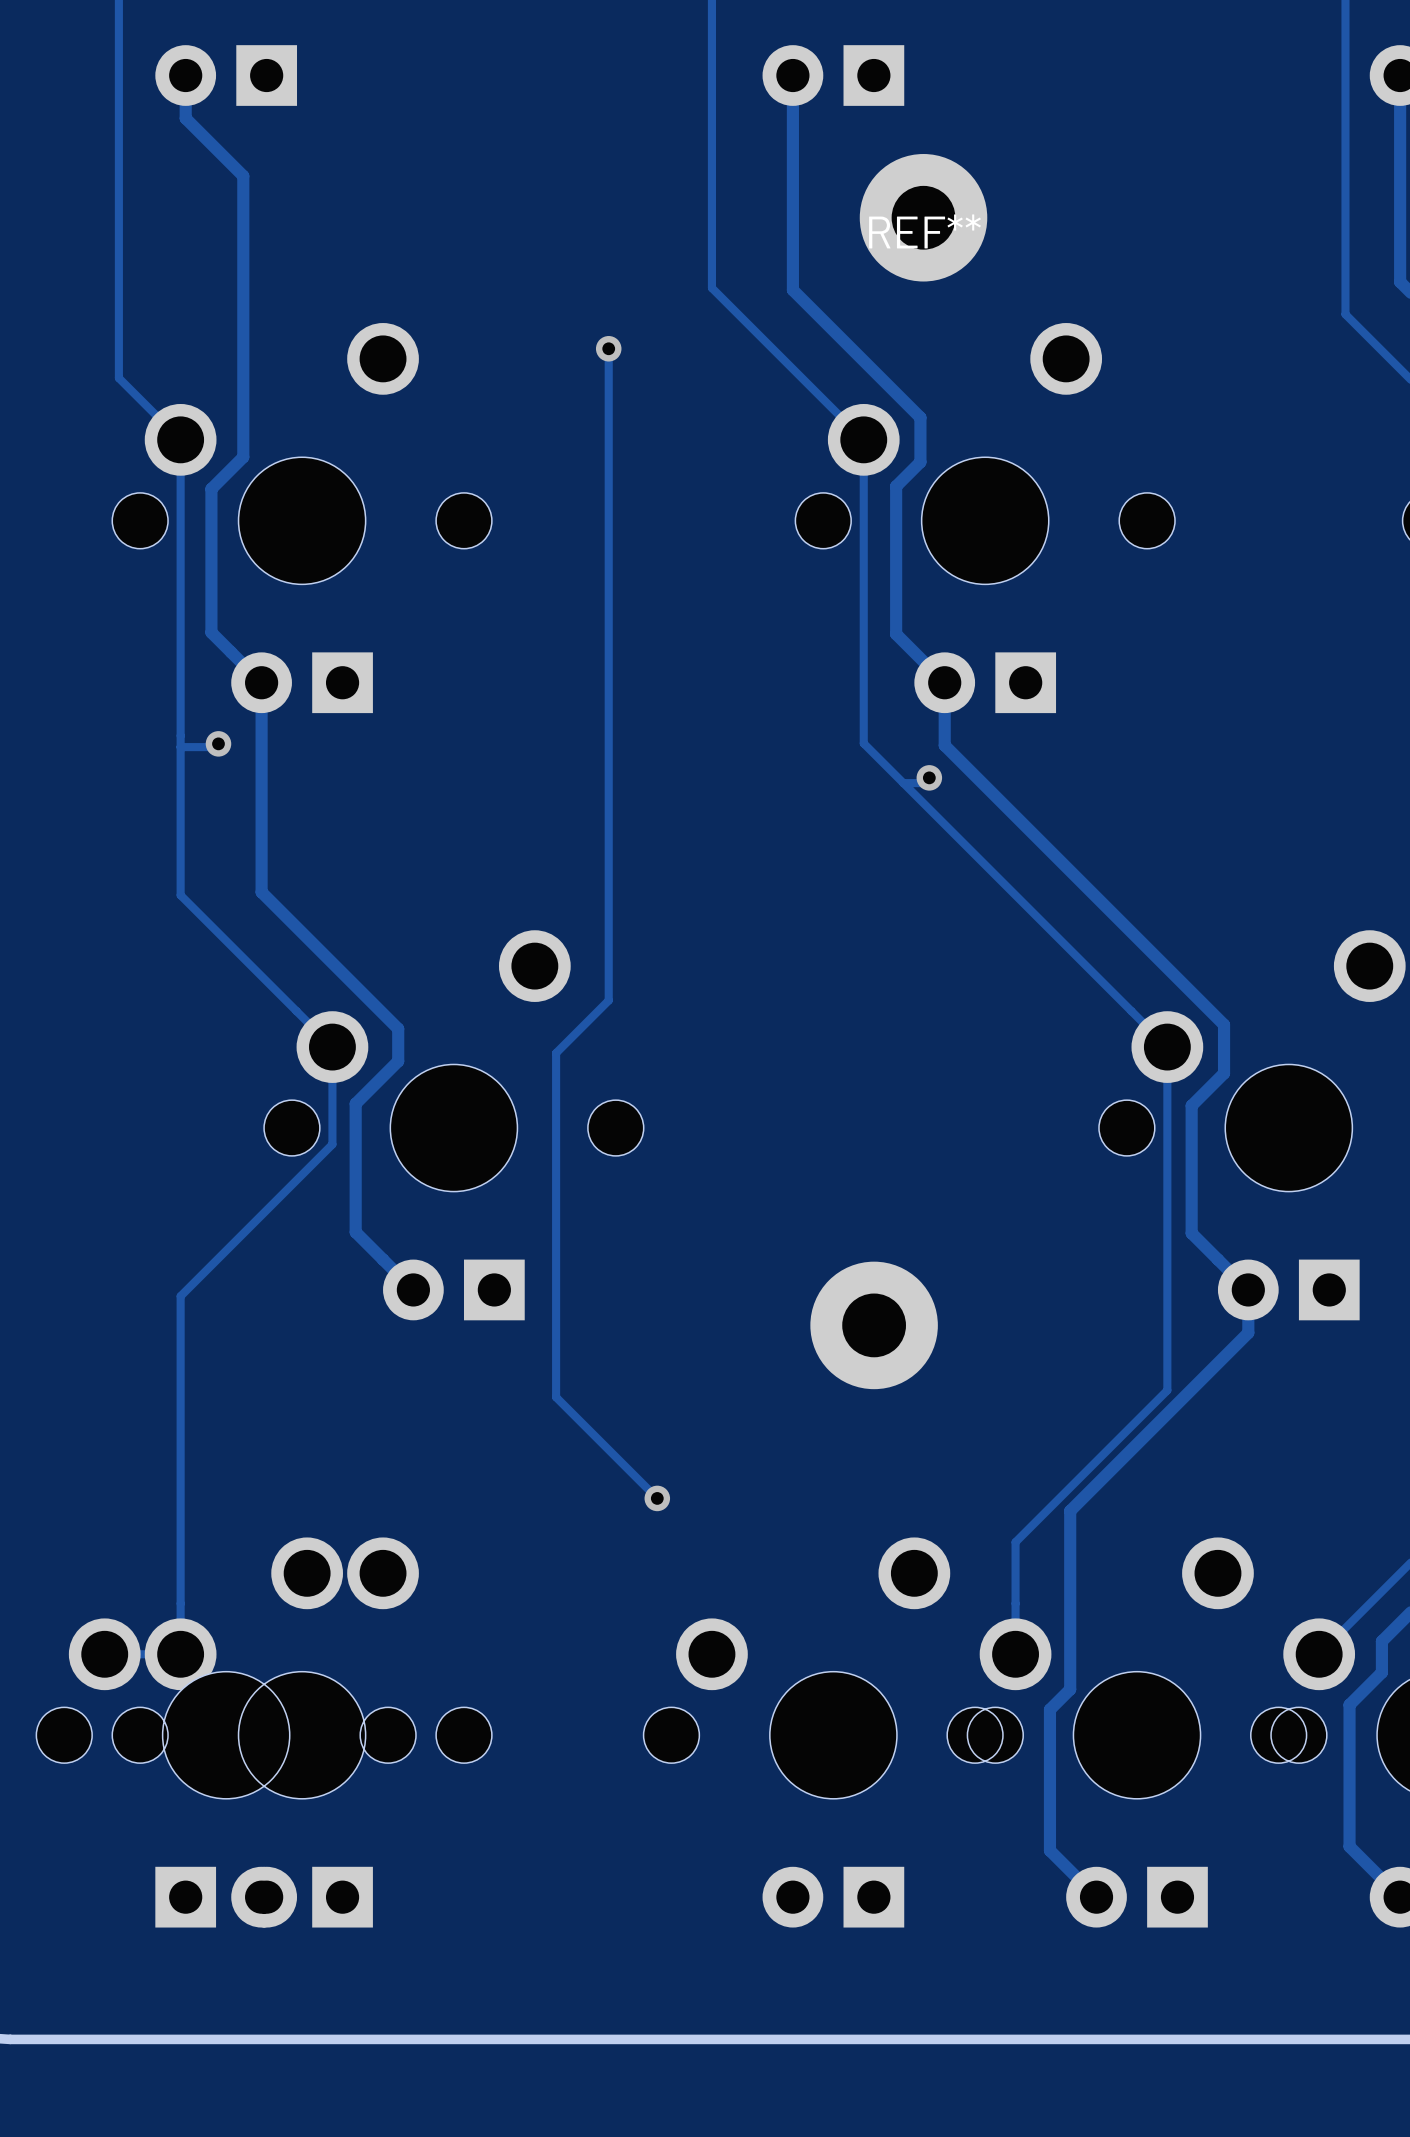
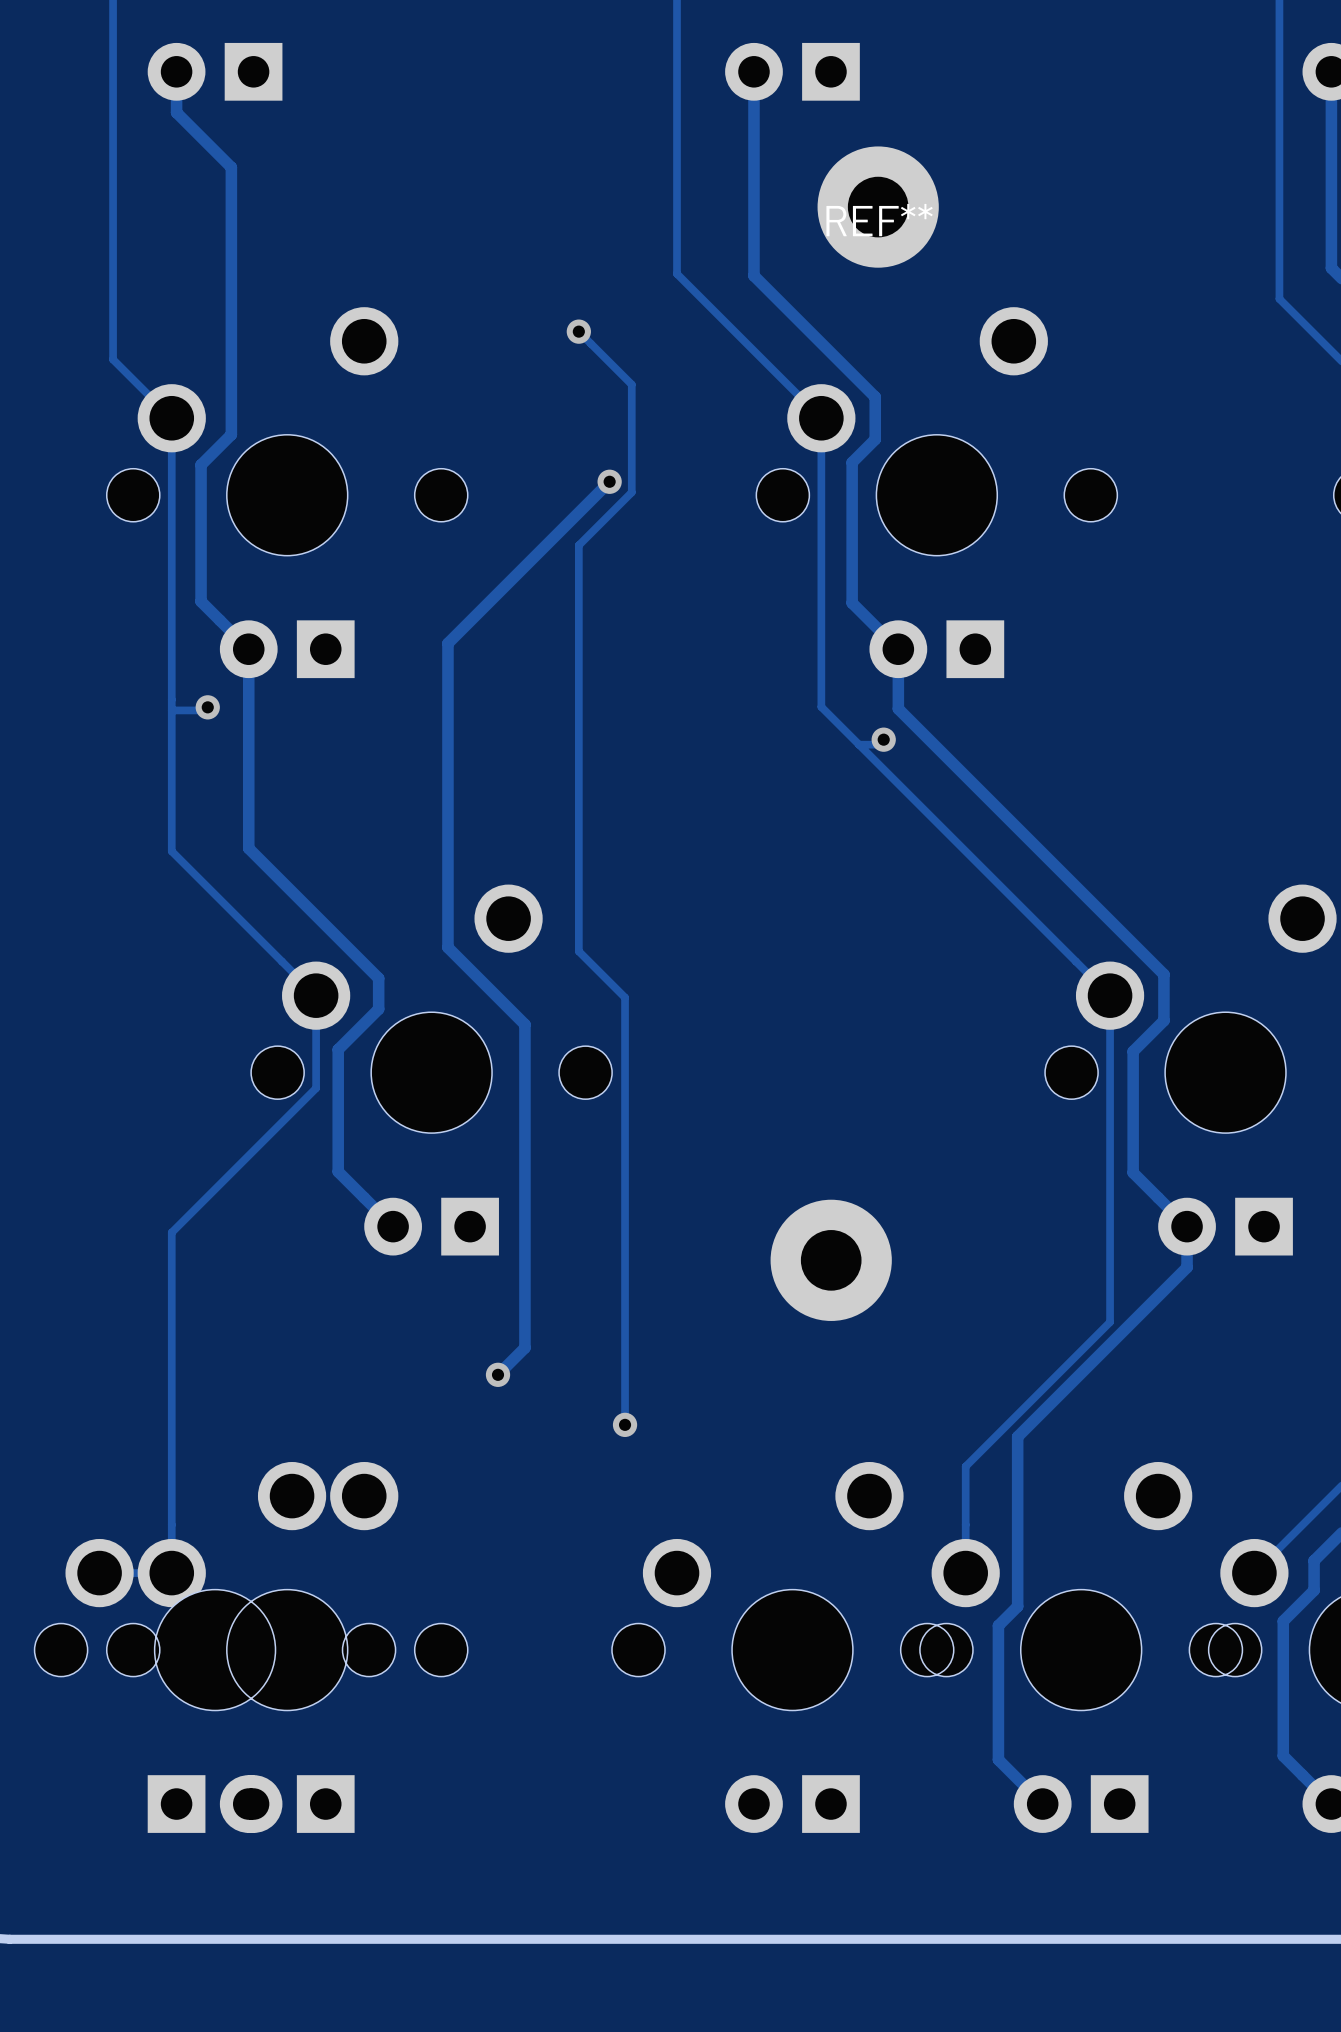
track: (608, 348) (608, 573) -> (578, 331) (631, 384) (631, 492) (578, 545)
track: none -> (609, 481) (447, 643) (447, 947) (524, 1024) (524, 1347) (498, 1374)
via: none -> (609, 481)
track: (608, 1000) (556, 1053) (556, 1397) (657, 1498) -> (578, 951) (625, 997) (625, 1424)
via: none -> (498, 1374)

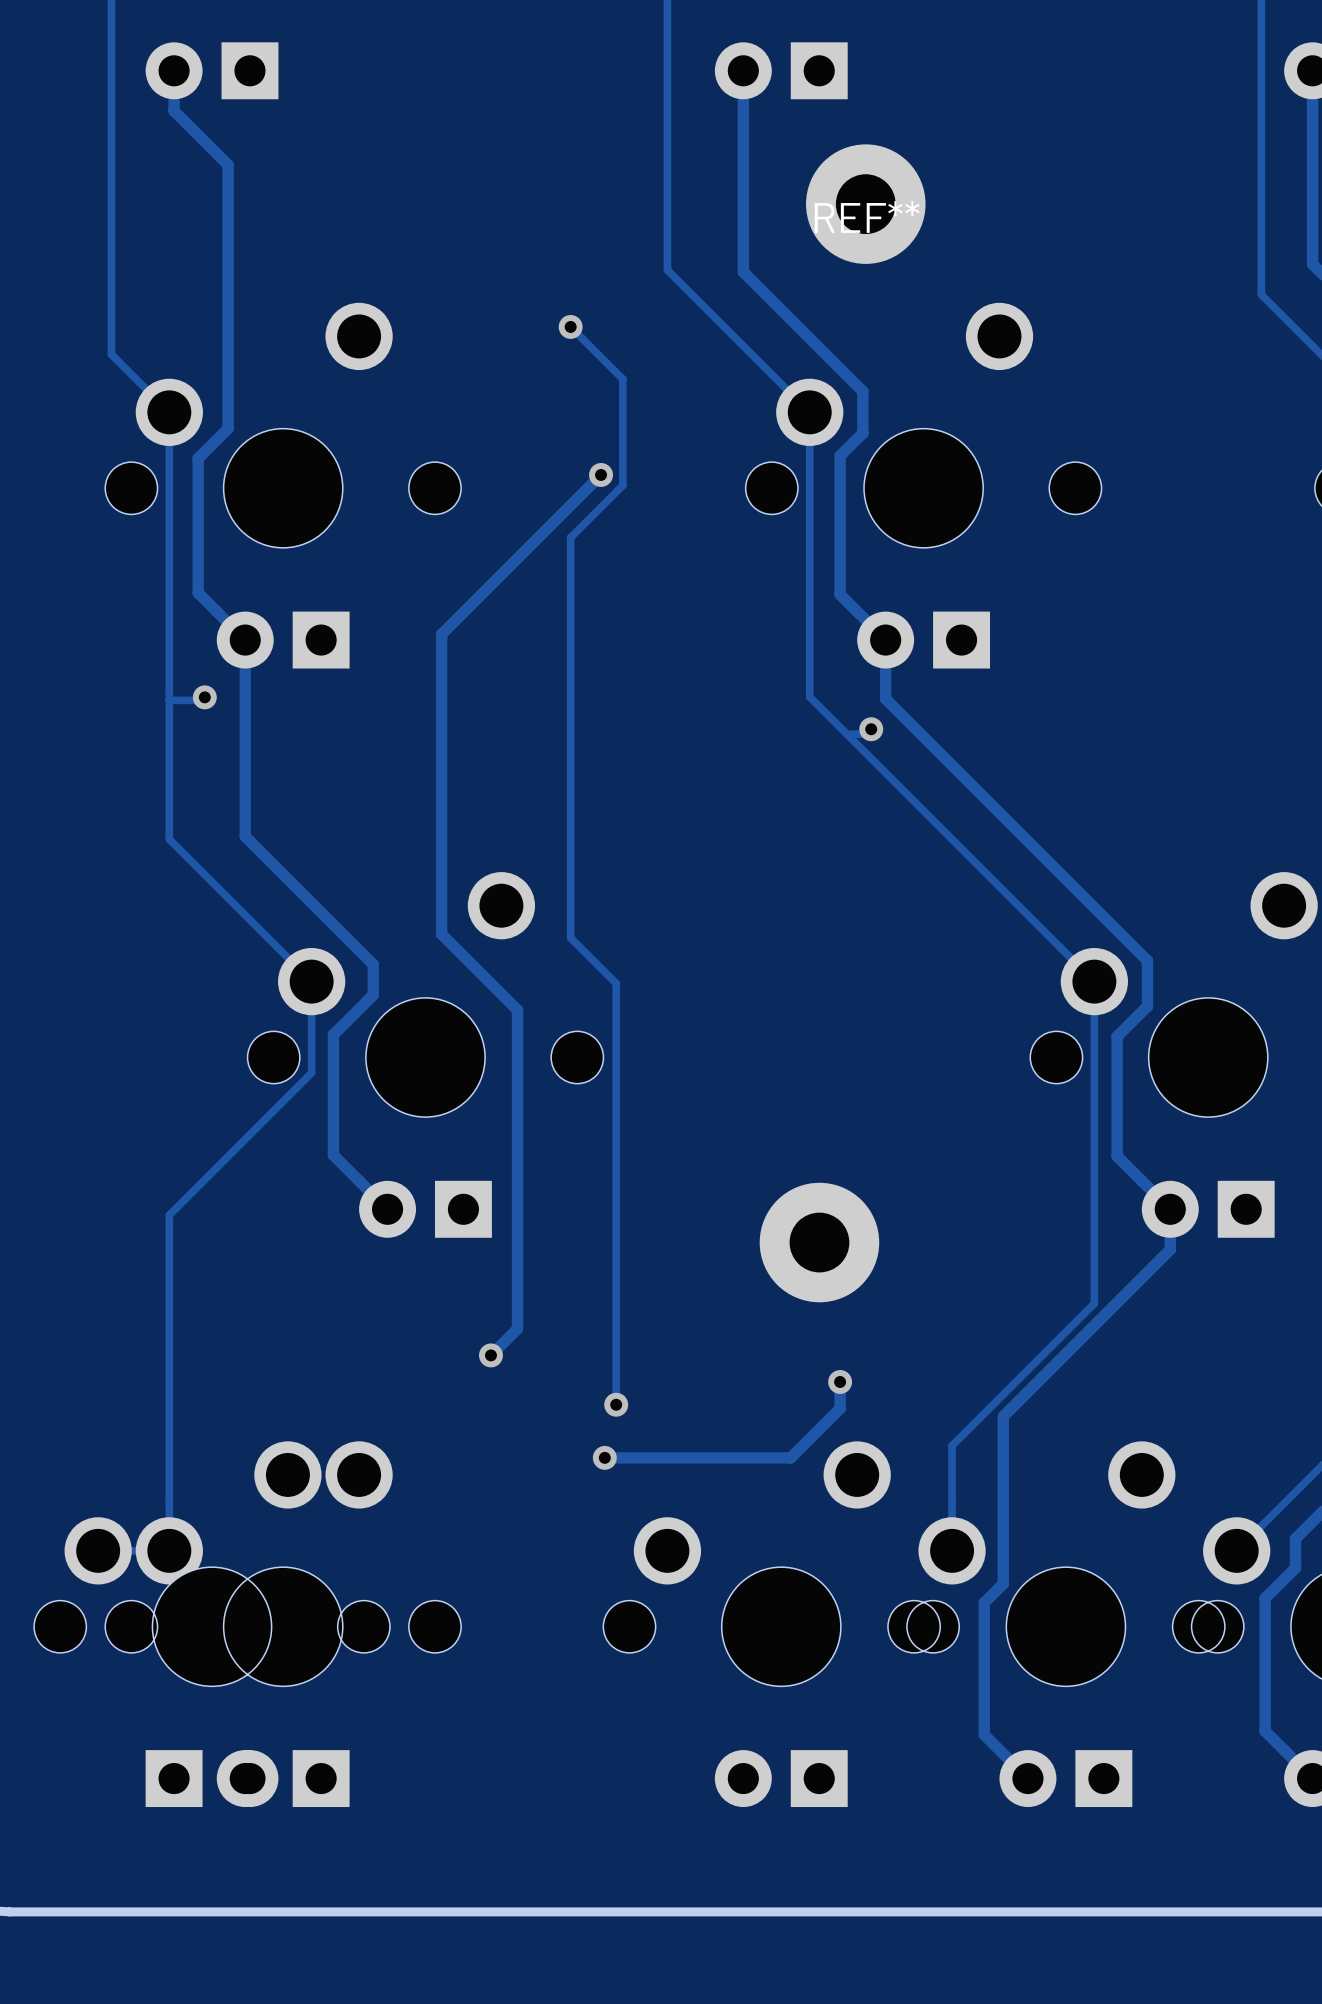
track: none -> (840, 1381) (840, 1408) (790, 1457) (604, 1457)
via: none -> (840, 1381)
via: none -> (604, 1457)

